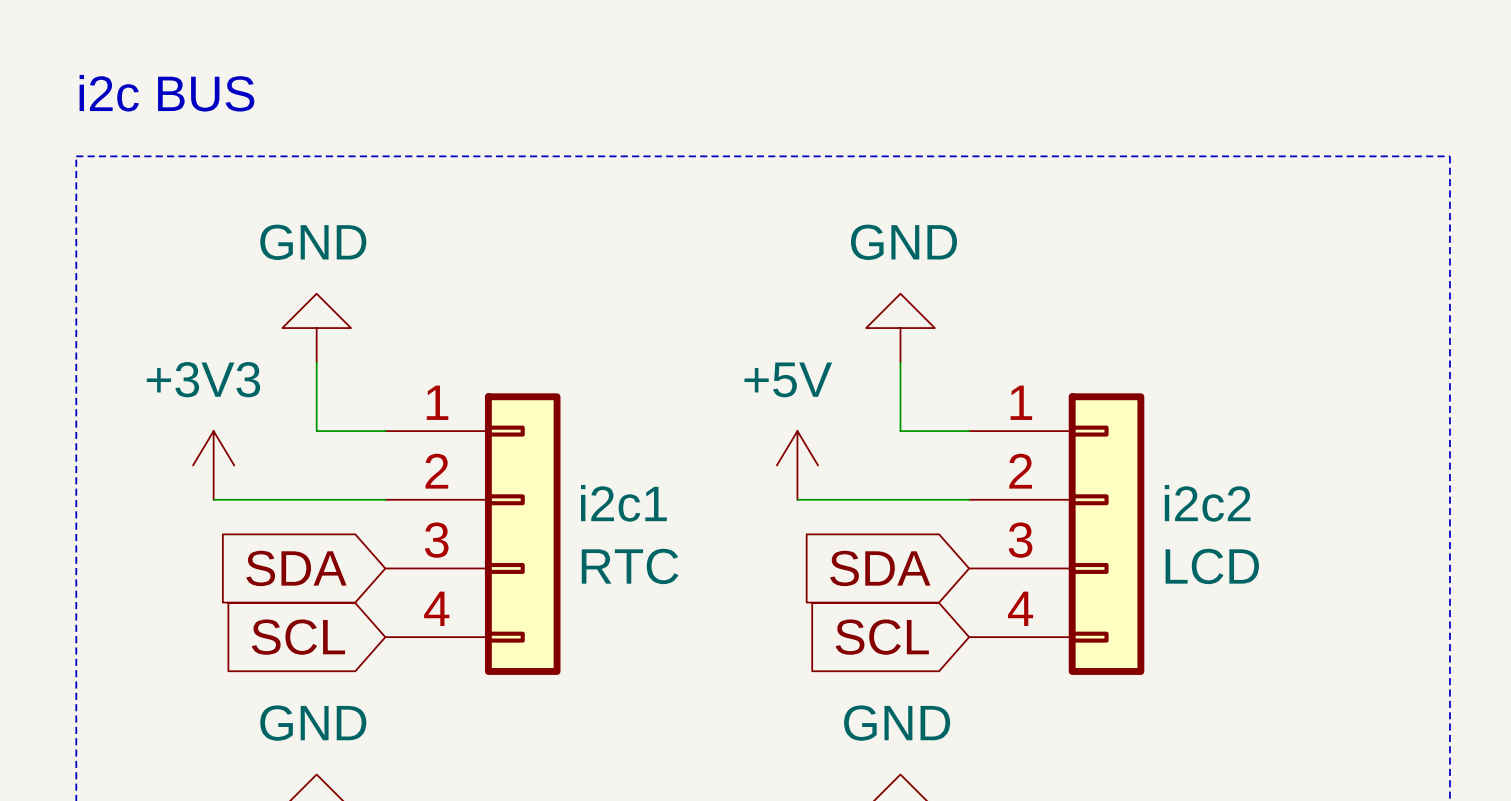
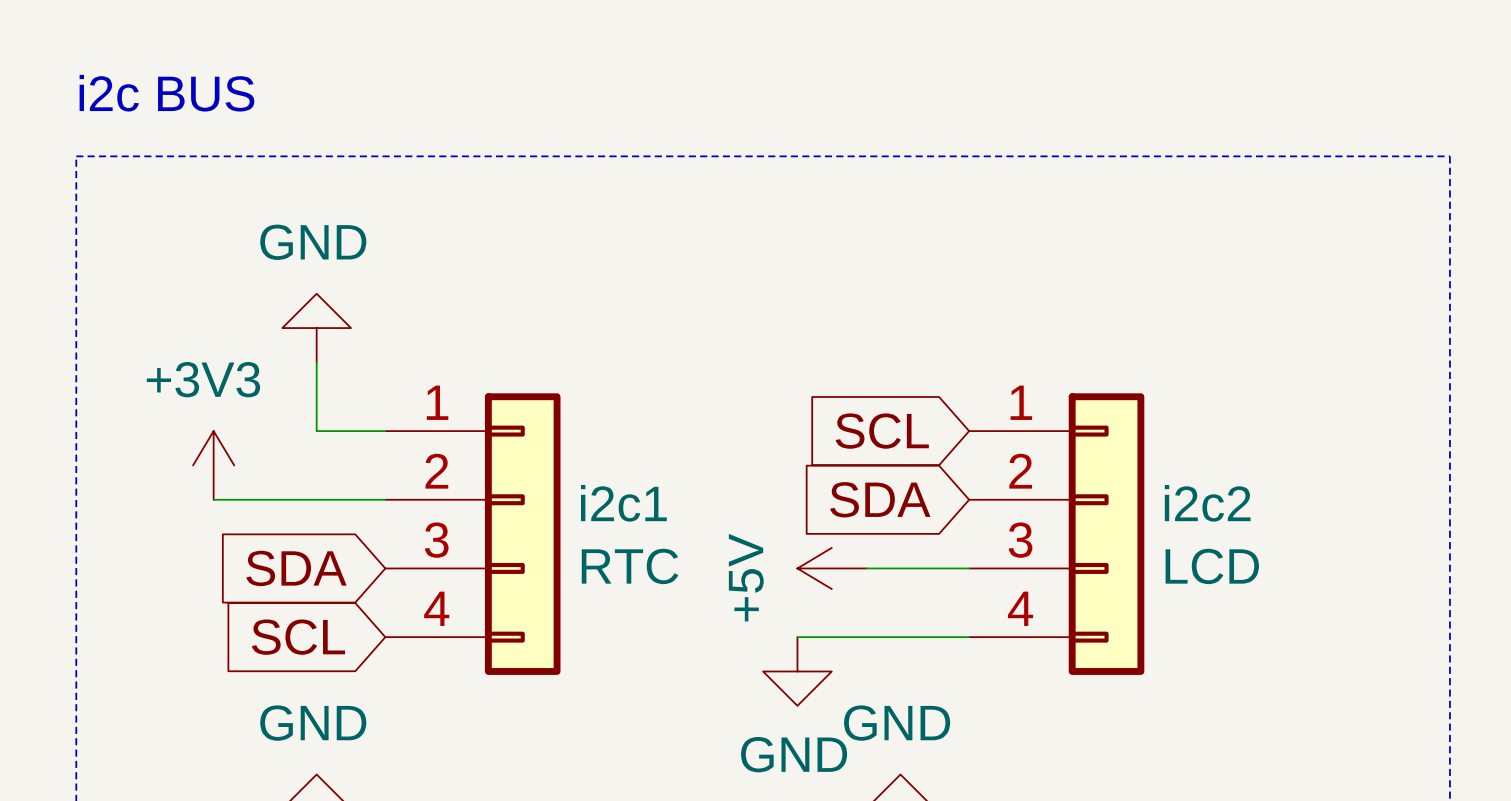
power symbol rotation: 0° (900, 328) -> 180° (797, 671)
power symbol position: GND (900, 328) -> GND (797, 671)
wire: (900, 362) (900, 431) (969, 431) -> none
power symbol rotation: 0° (797, 465) -> 90° counterclockwise (831, 568)
power symbol position: +5V (797, 465) -> +5V (831, 568)
wire: (797, 499) (969, 499) -> (797, 637) (969, 637)
wire: none -> (866, 568) (969, 568)
global label position: SDA (880, 568) -> SDA (880, 499)
global label position: SCL (882, 637) -> SCL (882, 431)

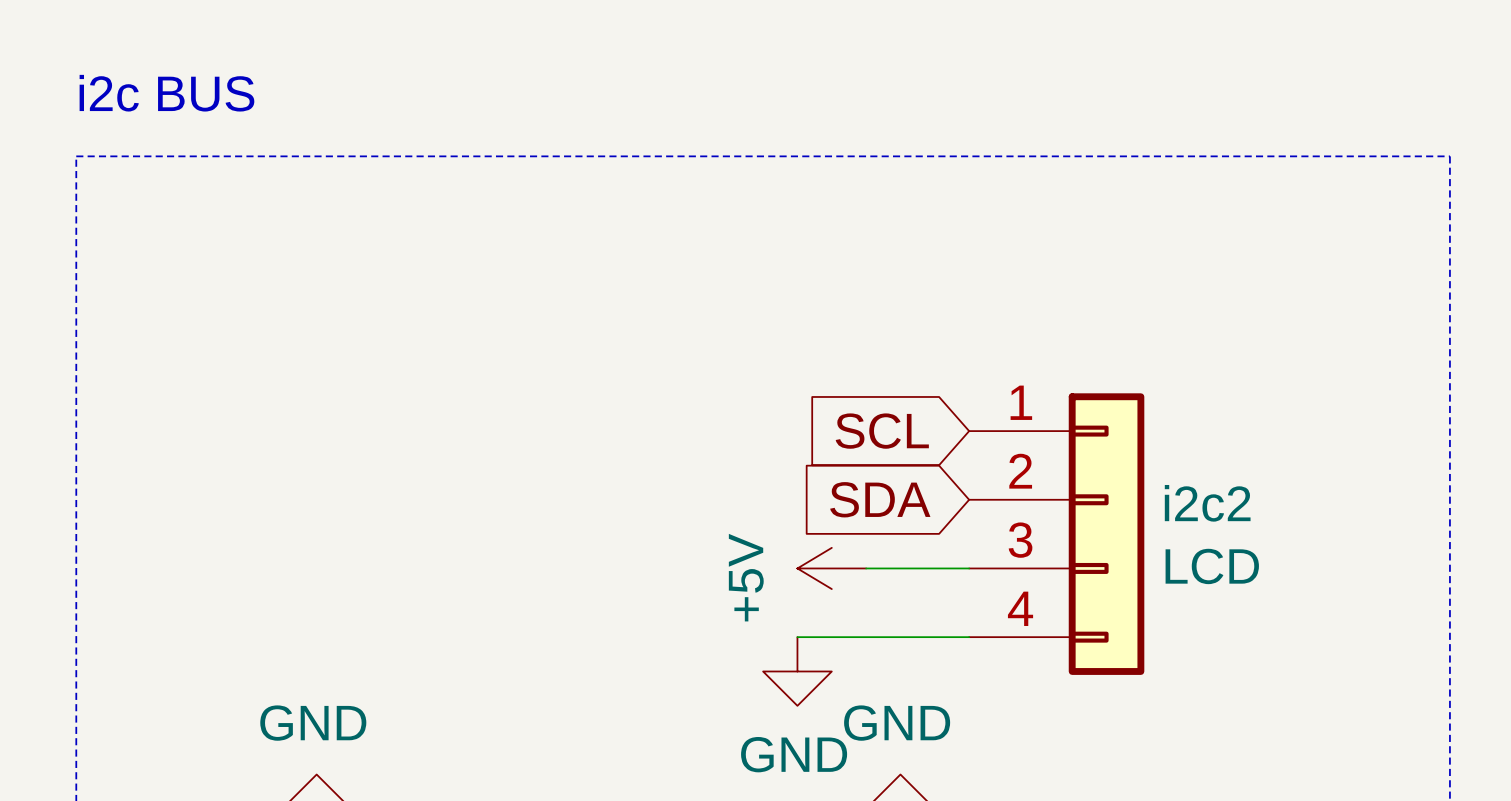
power symbol: GND (316, 328) -> none
wire: (316, 362) (316, 431) (385, 431) -> none
power symbol: +3V3 (213, 465) -> none
wire: (213, 499) (385, 499) -> none
i2c1: RTC (472, 534) -> none
global label: SDA (296, 568) -> none
global label: SCL (298, 637) -> none

